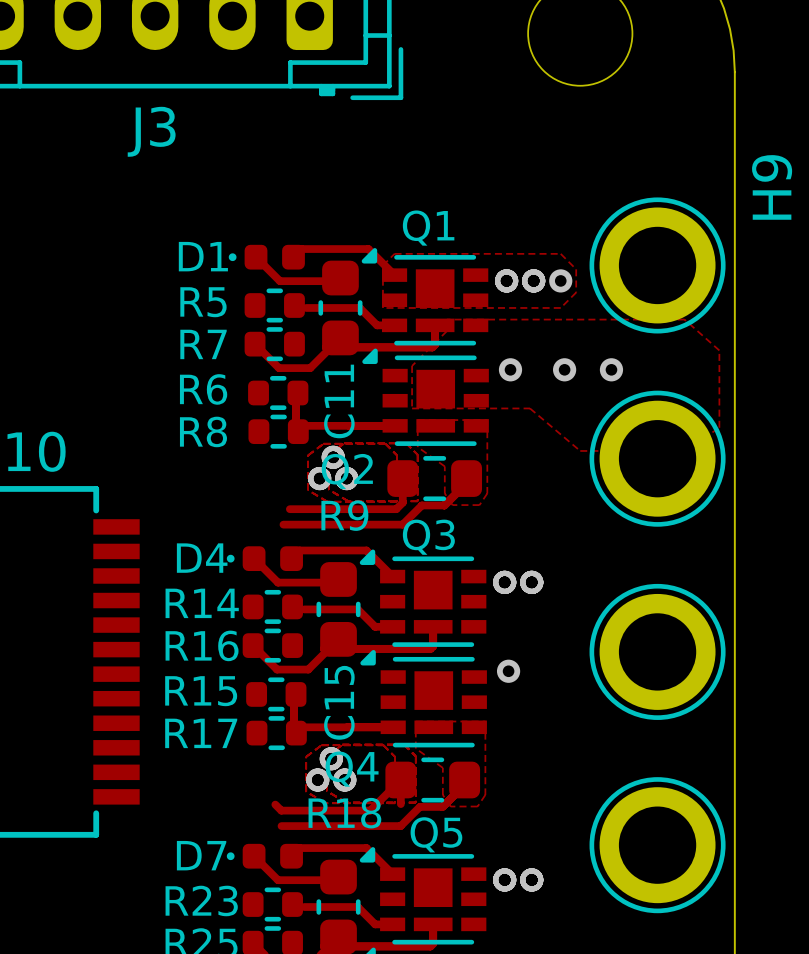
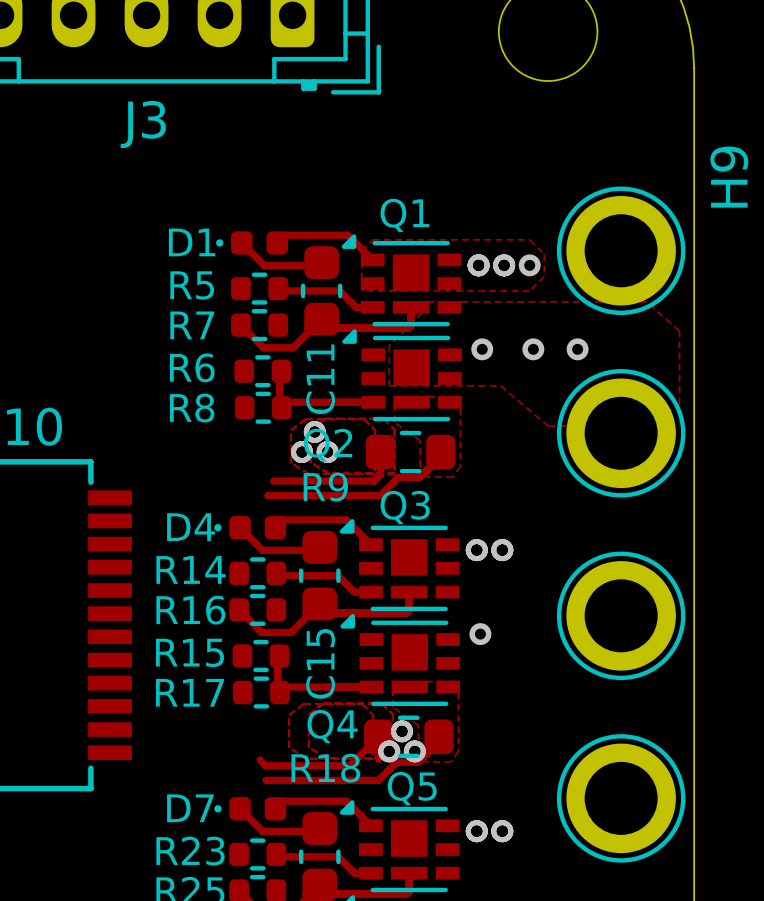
via: (331, 758) -> none
via: none -> (402, 731)
via: (317, 780) -> none
via: (344, 780) -> none
via: none -> (389, 751)
via: none -> (414, 751)

